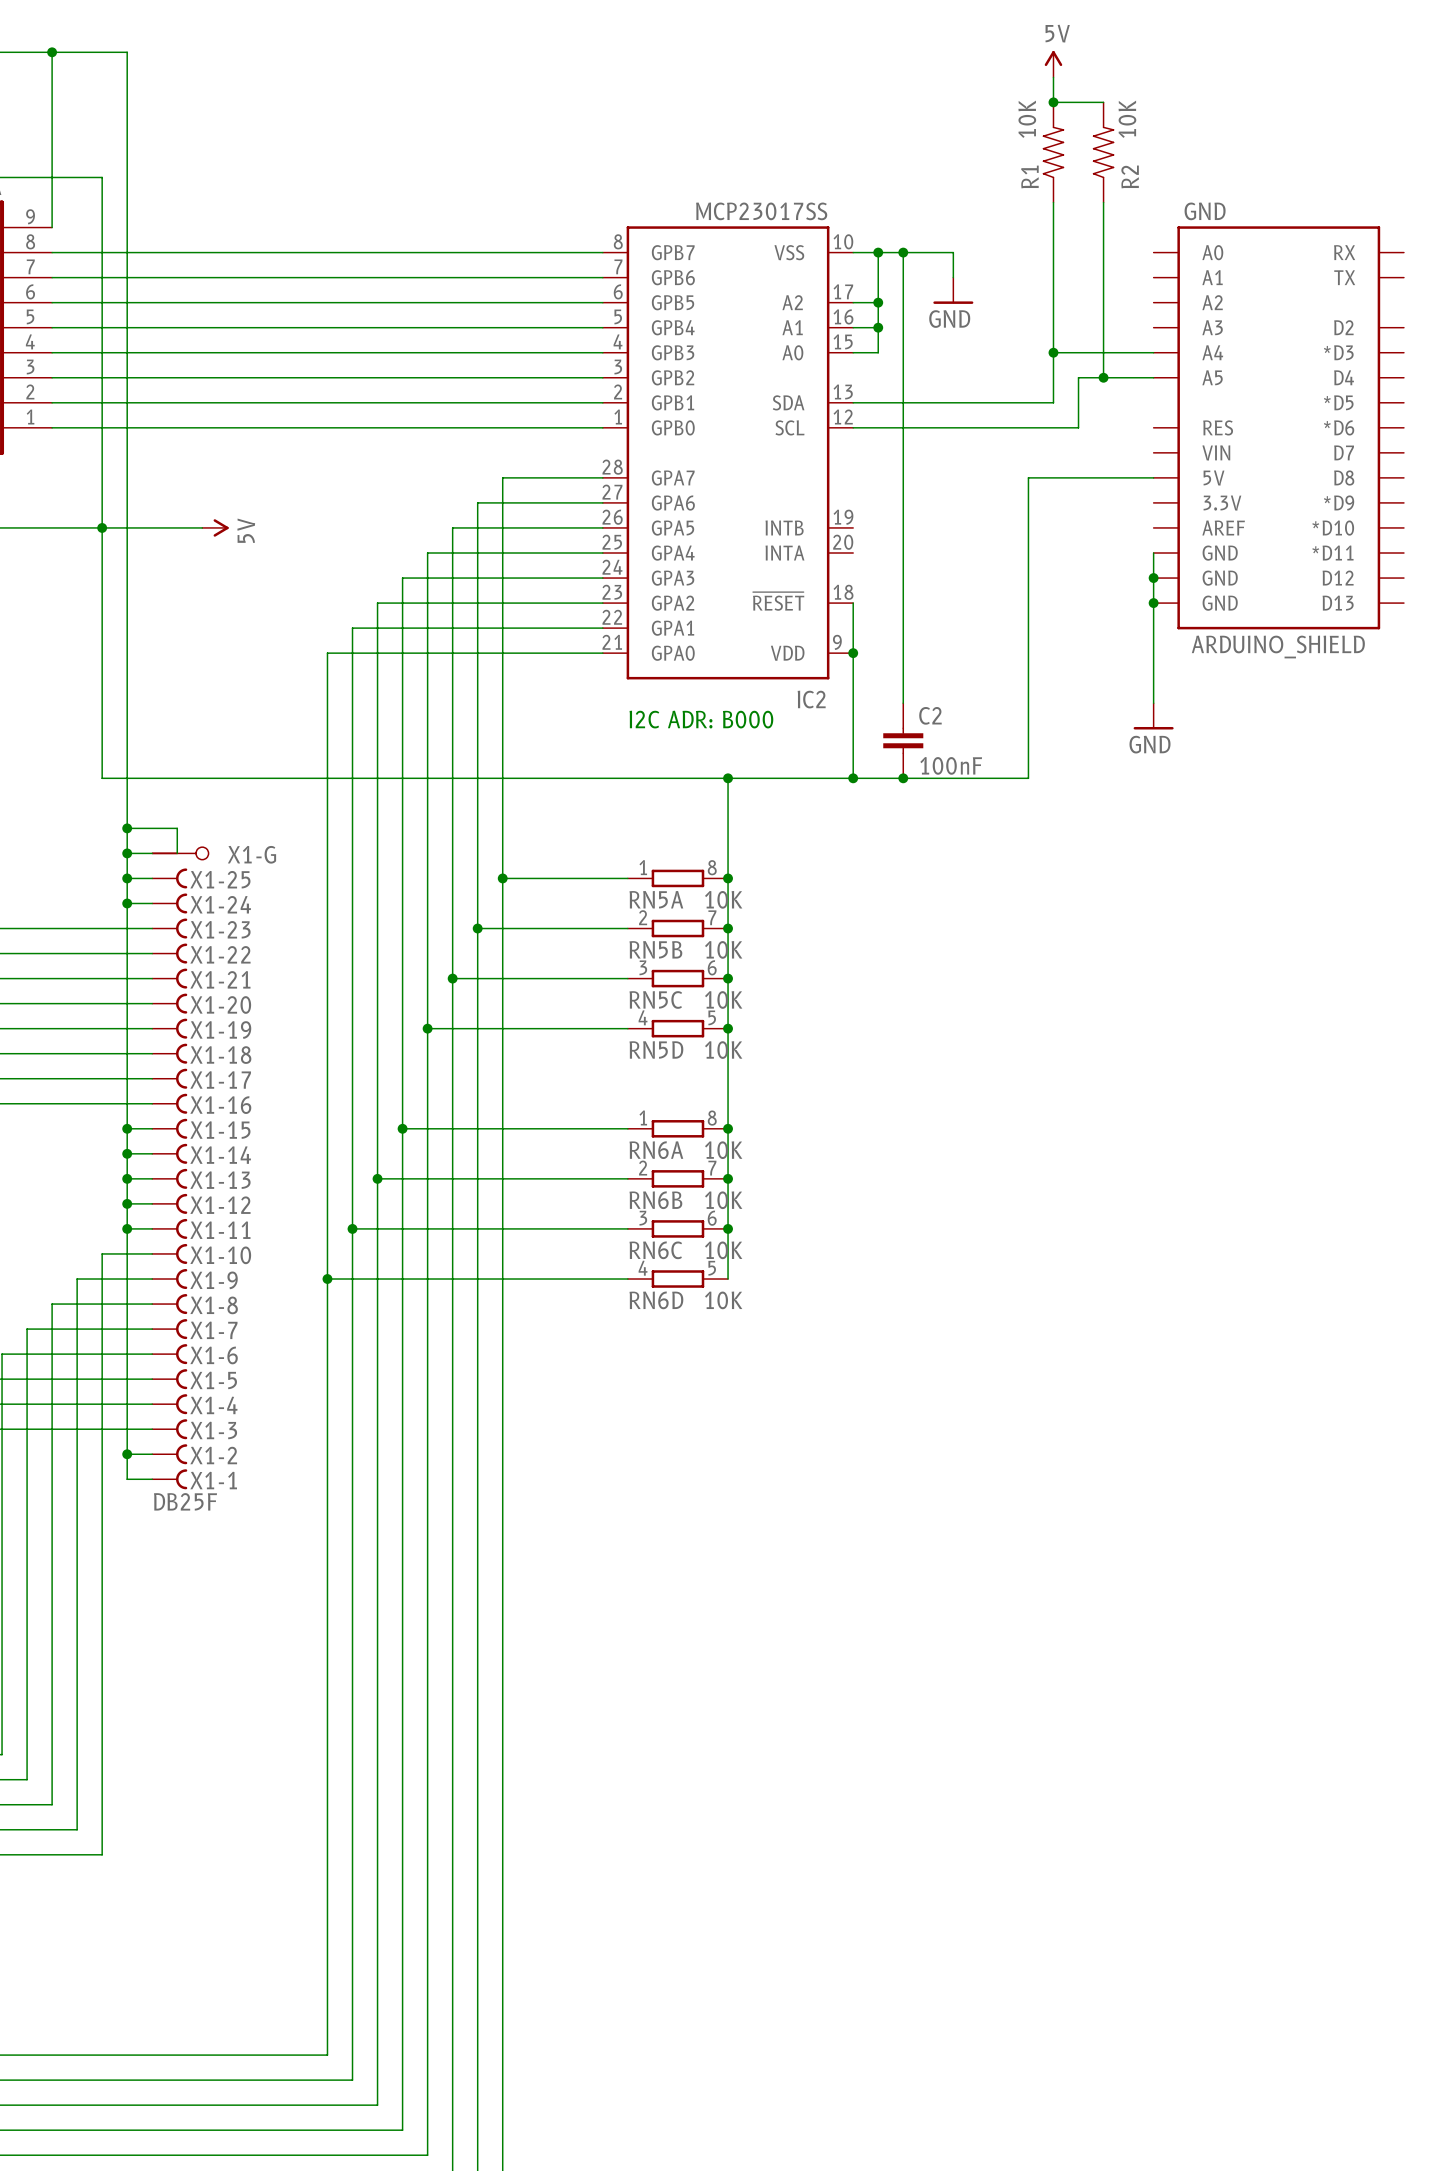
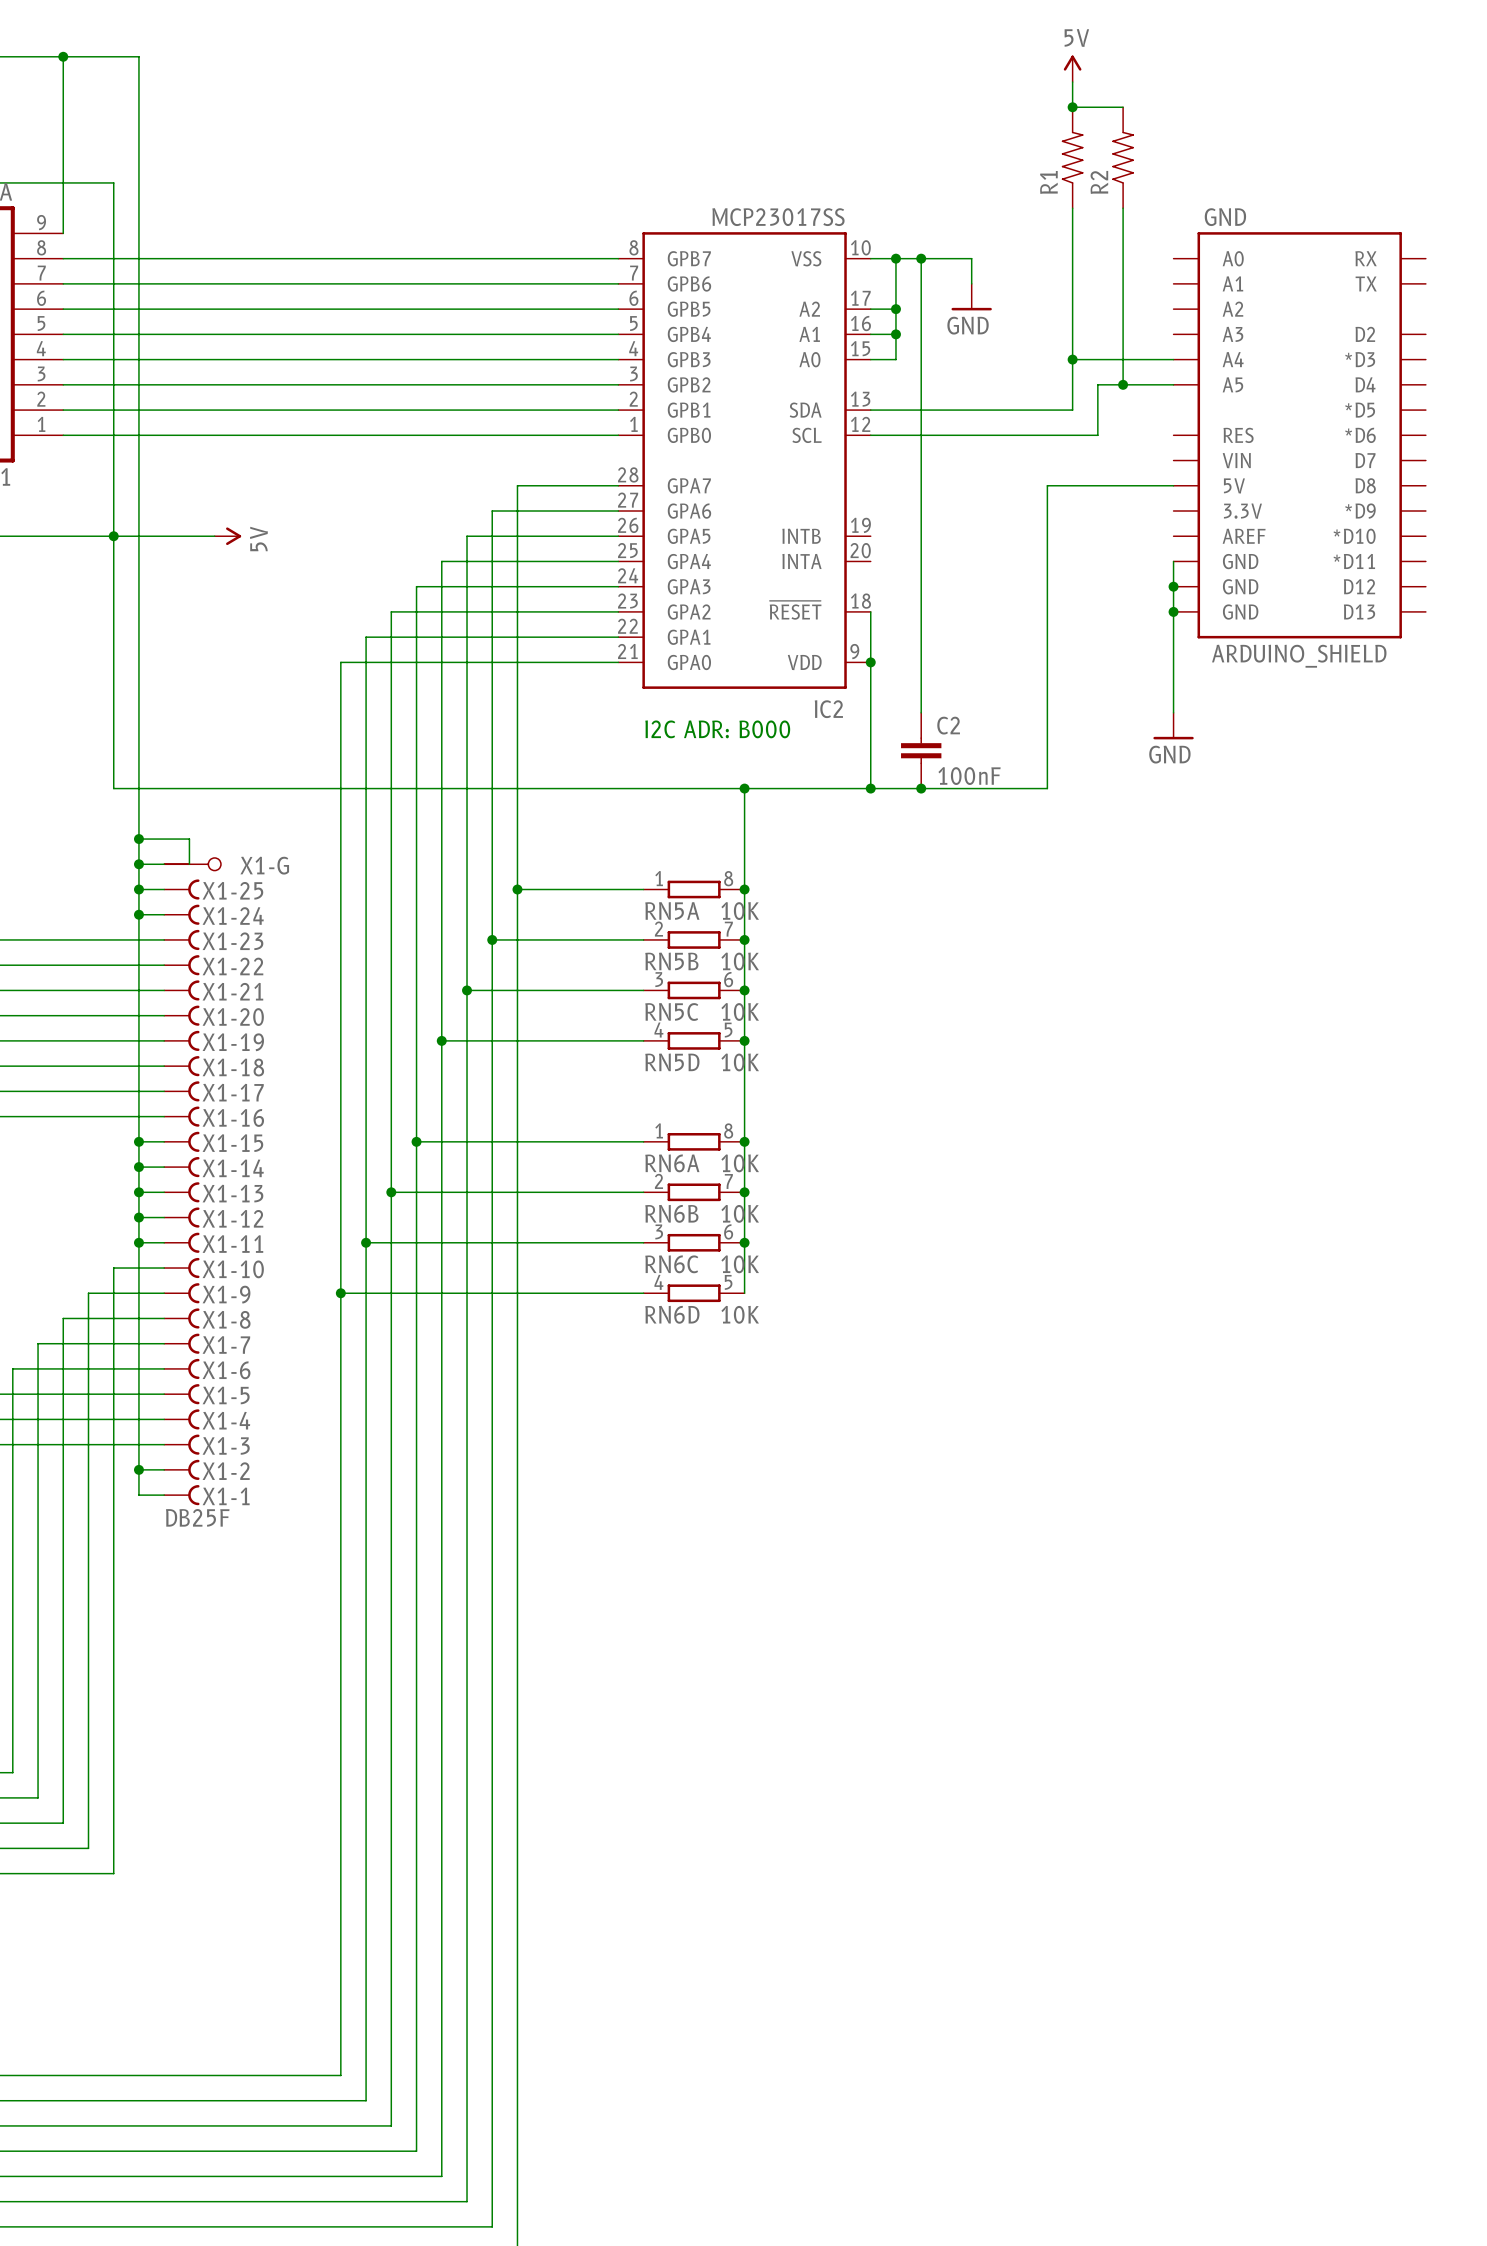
R1 value: 10K (1027, 119) -> none
R2 value: 10K (1127, 119) -> none
R2 name position: R2 (1130, 176) -> R2 (1099, 182)

